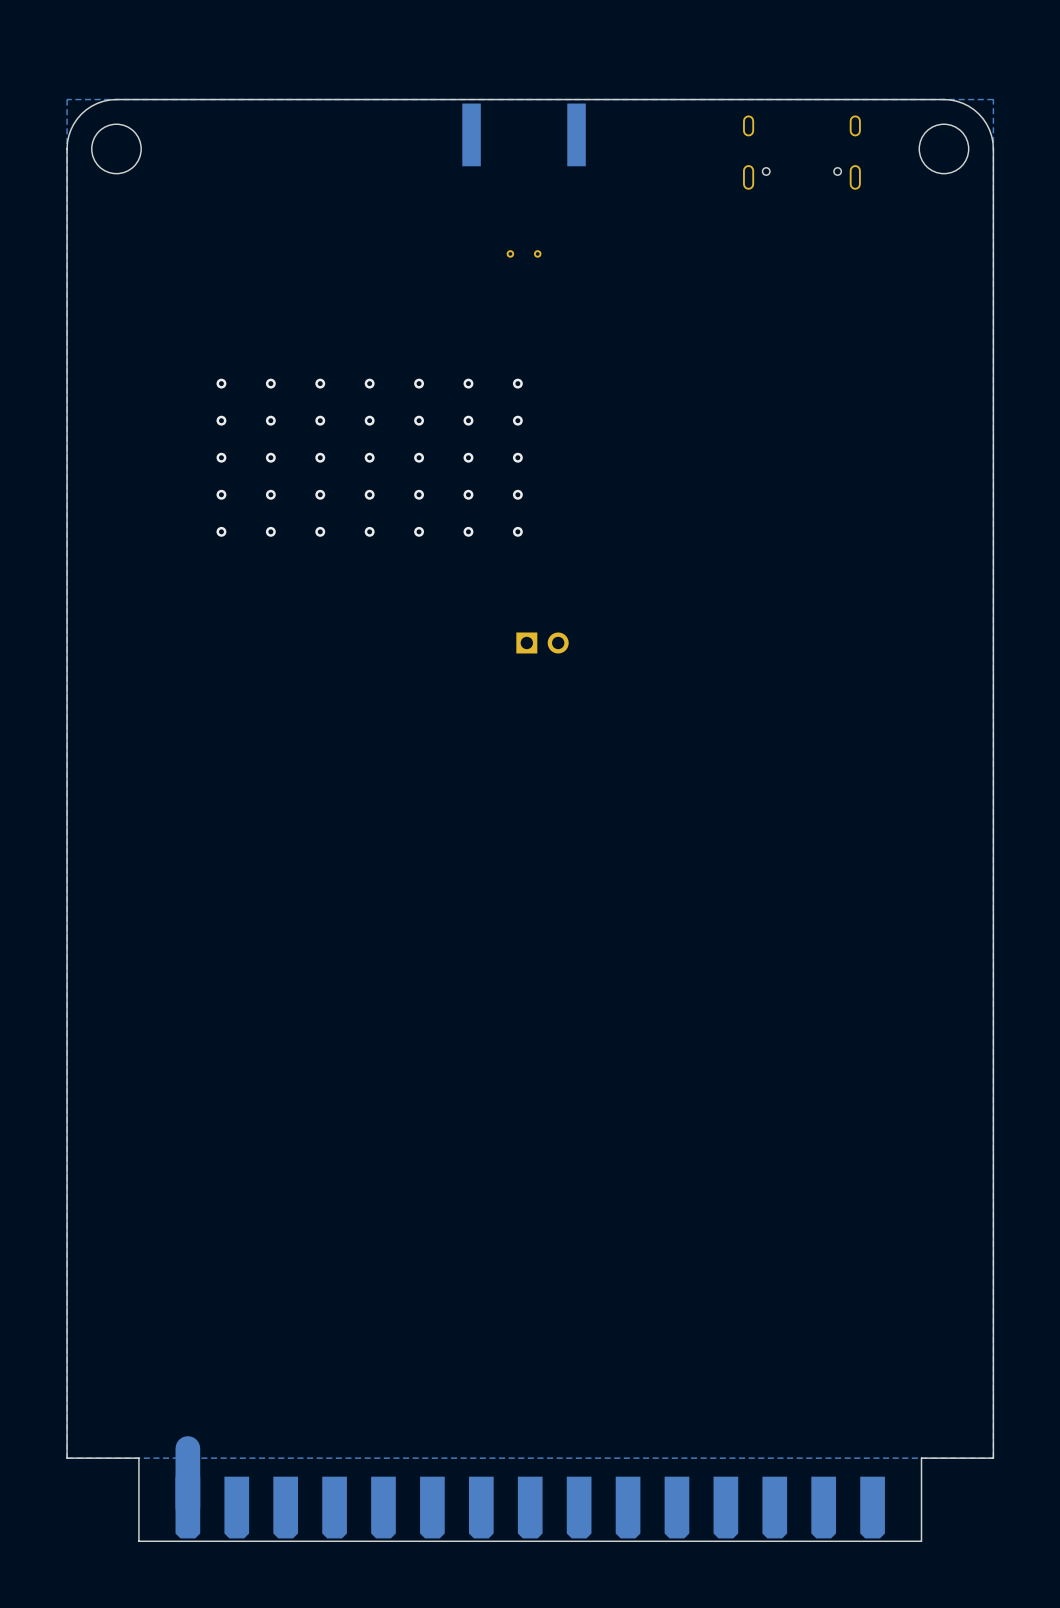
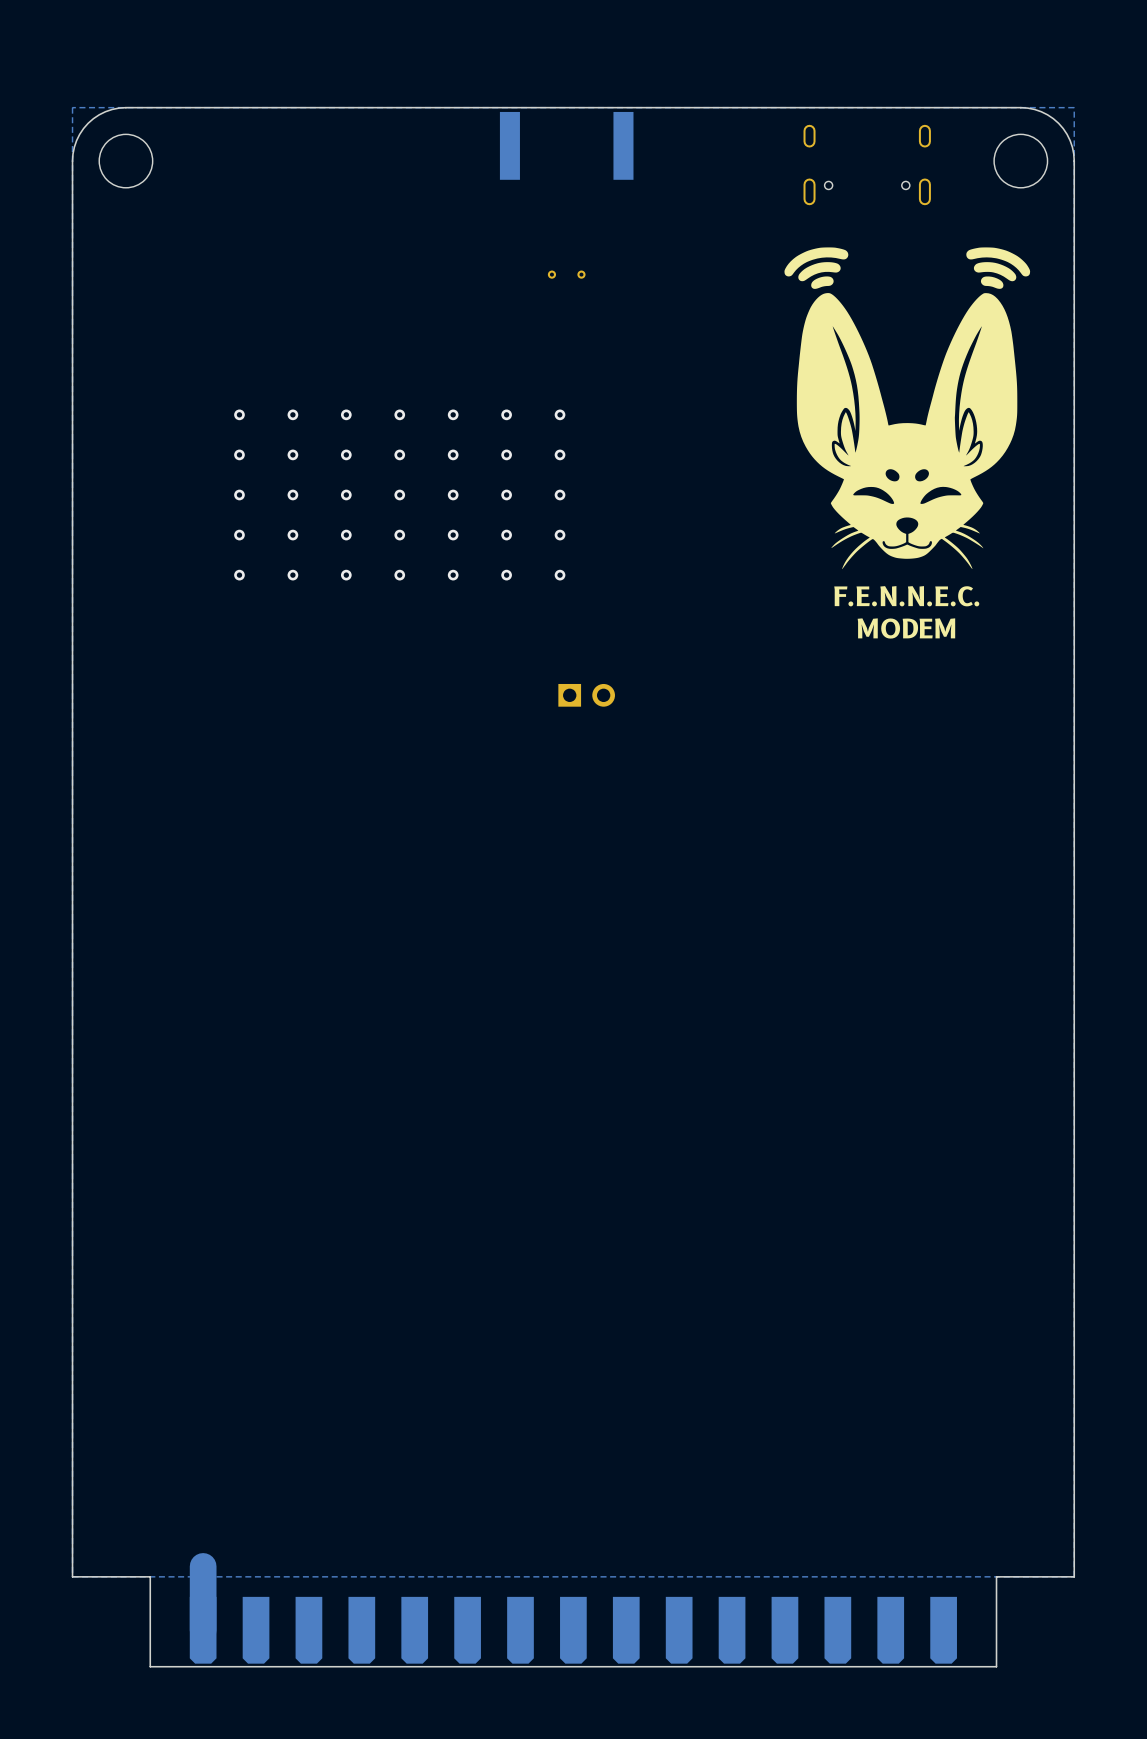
drawing: none -> [784, 247, 1031, 570]
text: none -> F.E.N.N.E.C. (906, 596)
text: none -> MODEM (906, 628)

